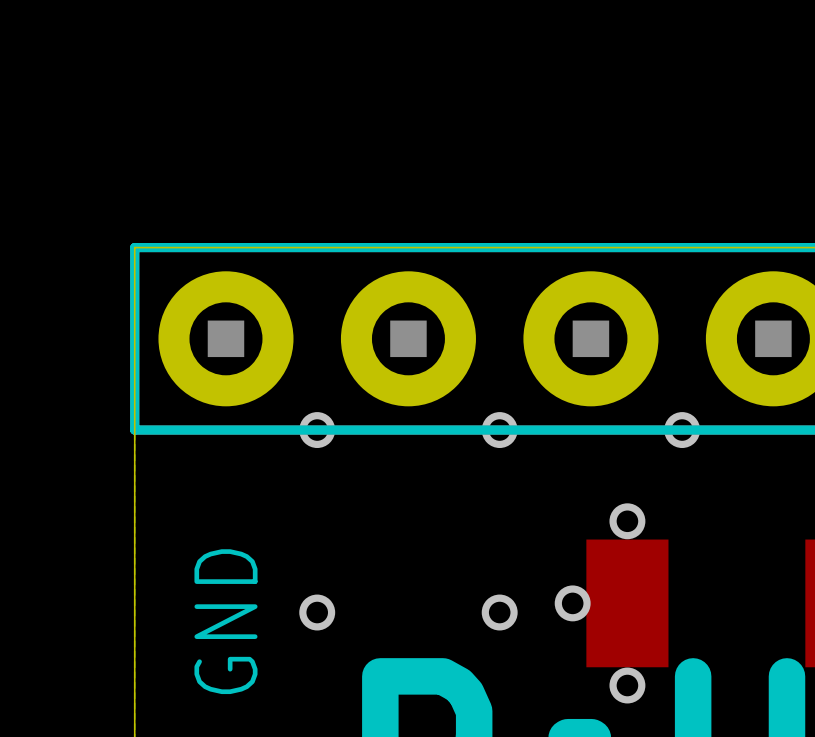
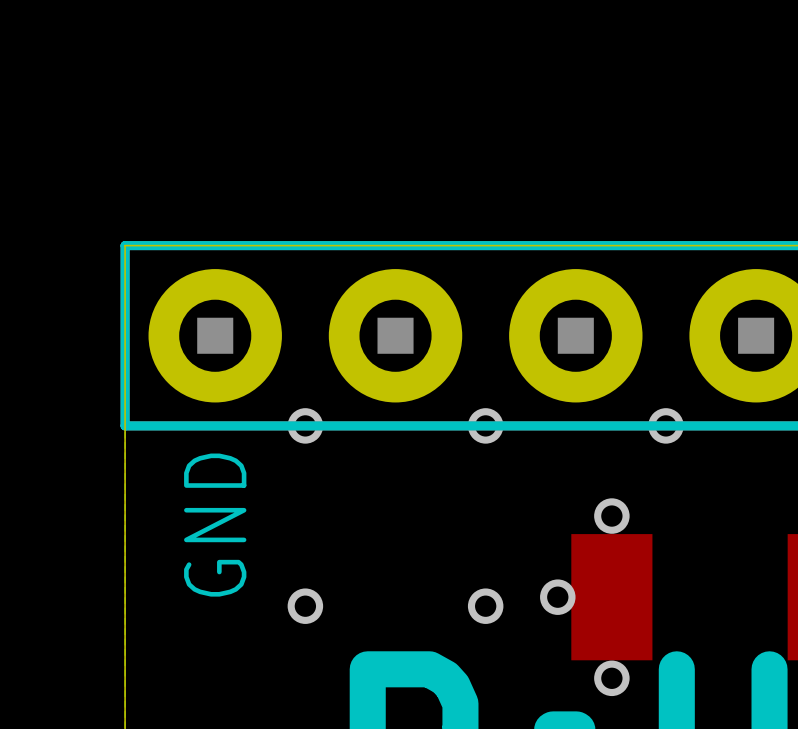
text position: GND (225, 621) -> GND (215, 525)

